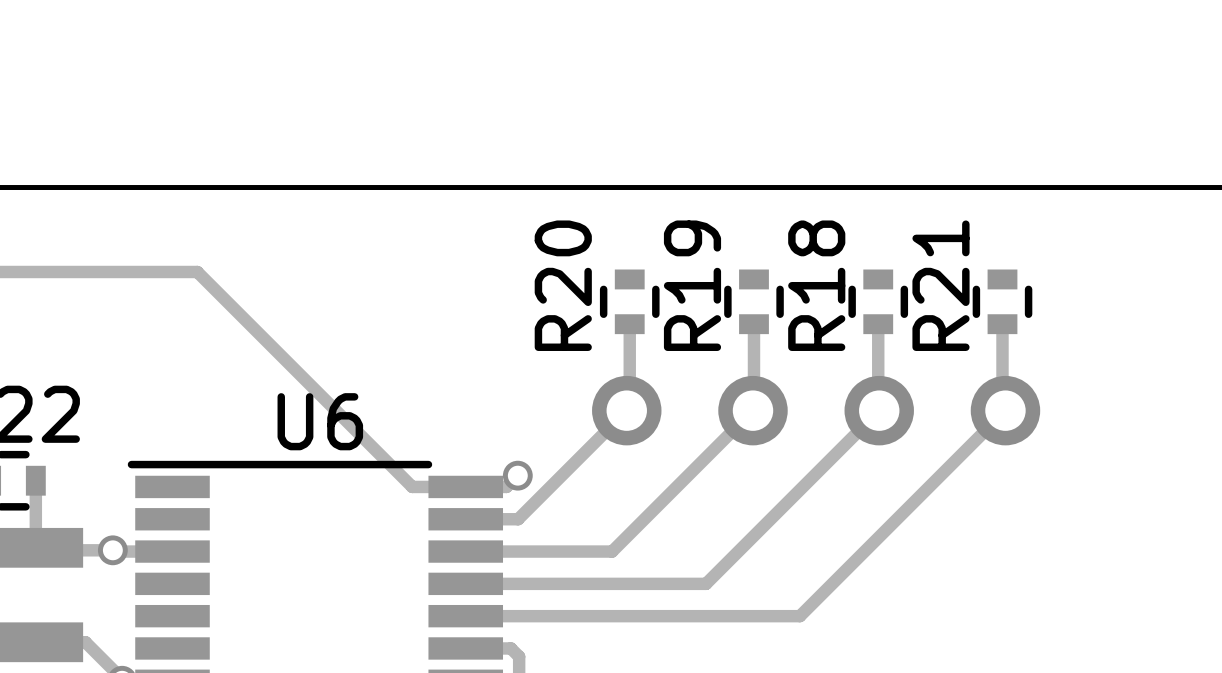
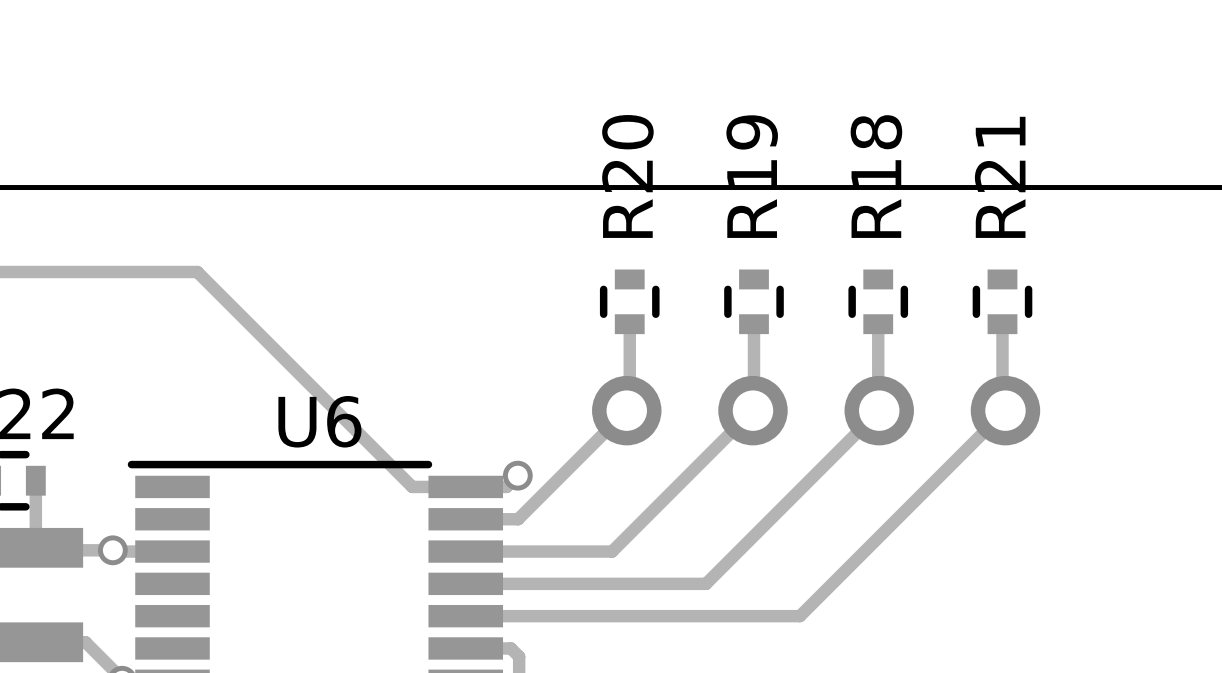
R20 name position: R20 (563, 285) -> R20 (627, 176)
R19 name position: R19 (692, 285) -> R19 (752, 176)
R18 name position: R18 (816, 285) -> R18 (876, 176)
R21 name position: R21 (940, 285) -> R21 (1000, 177)

